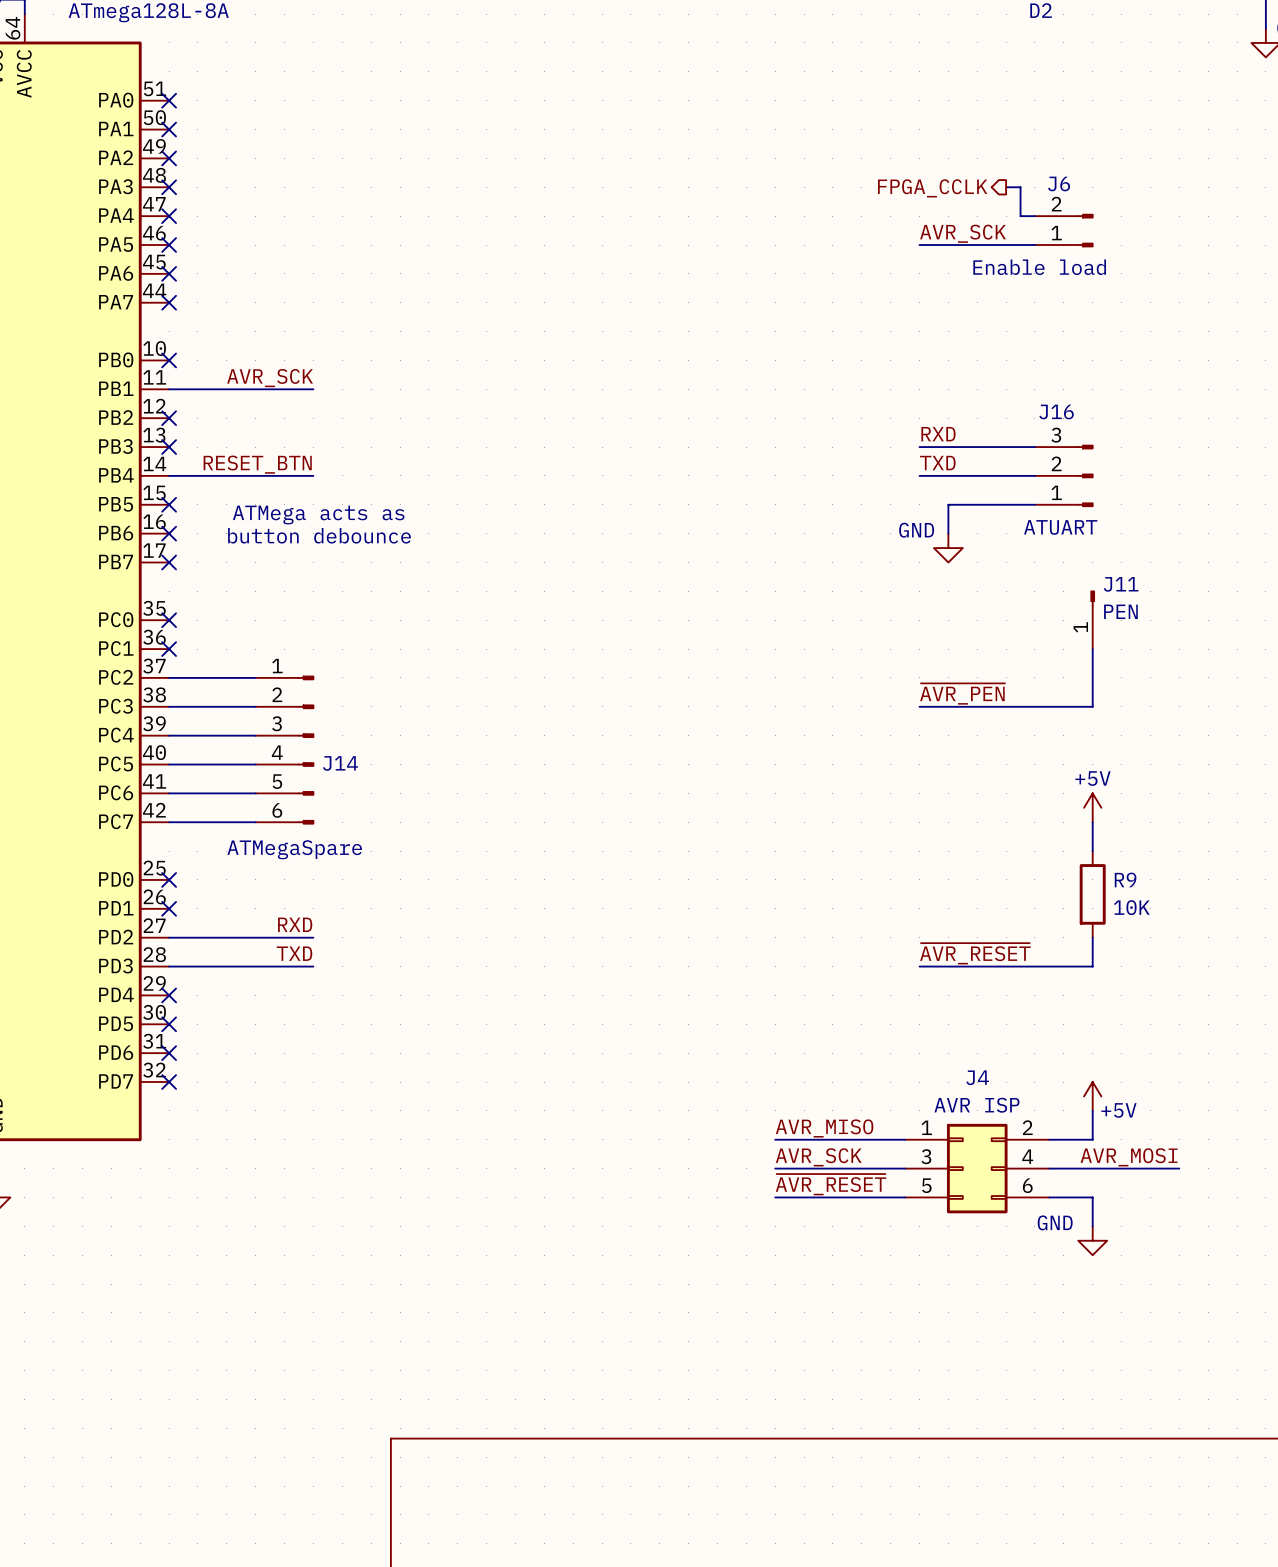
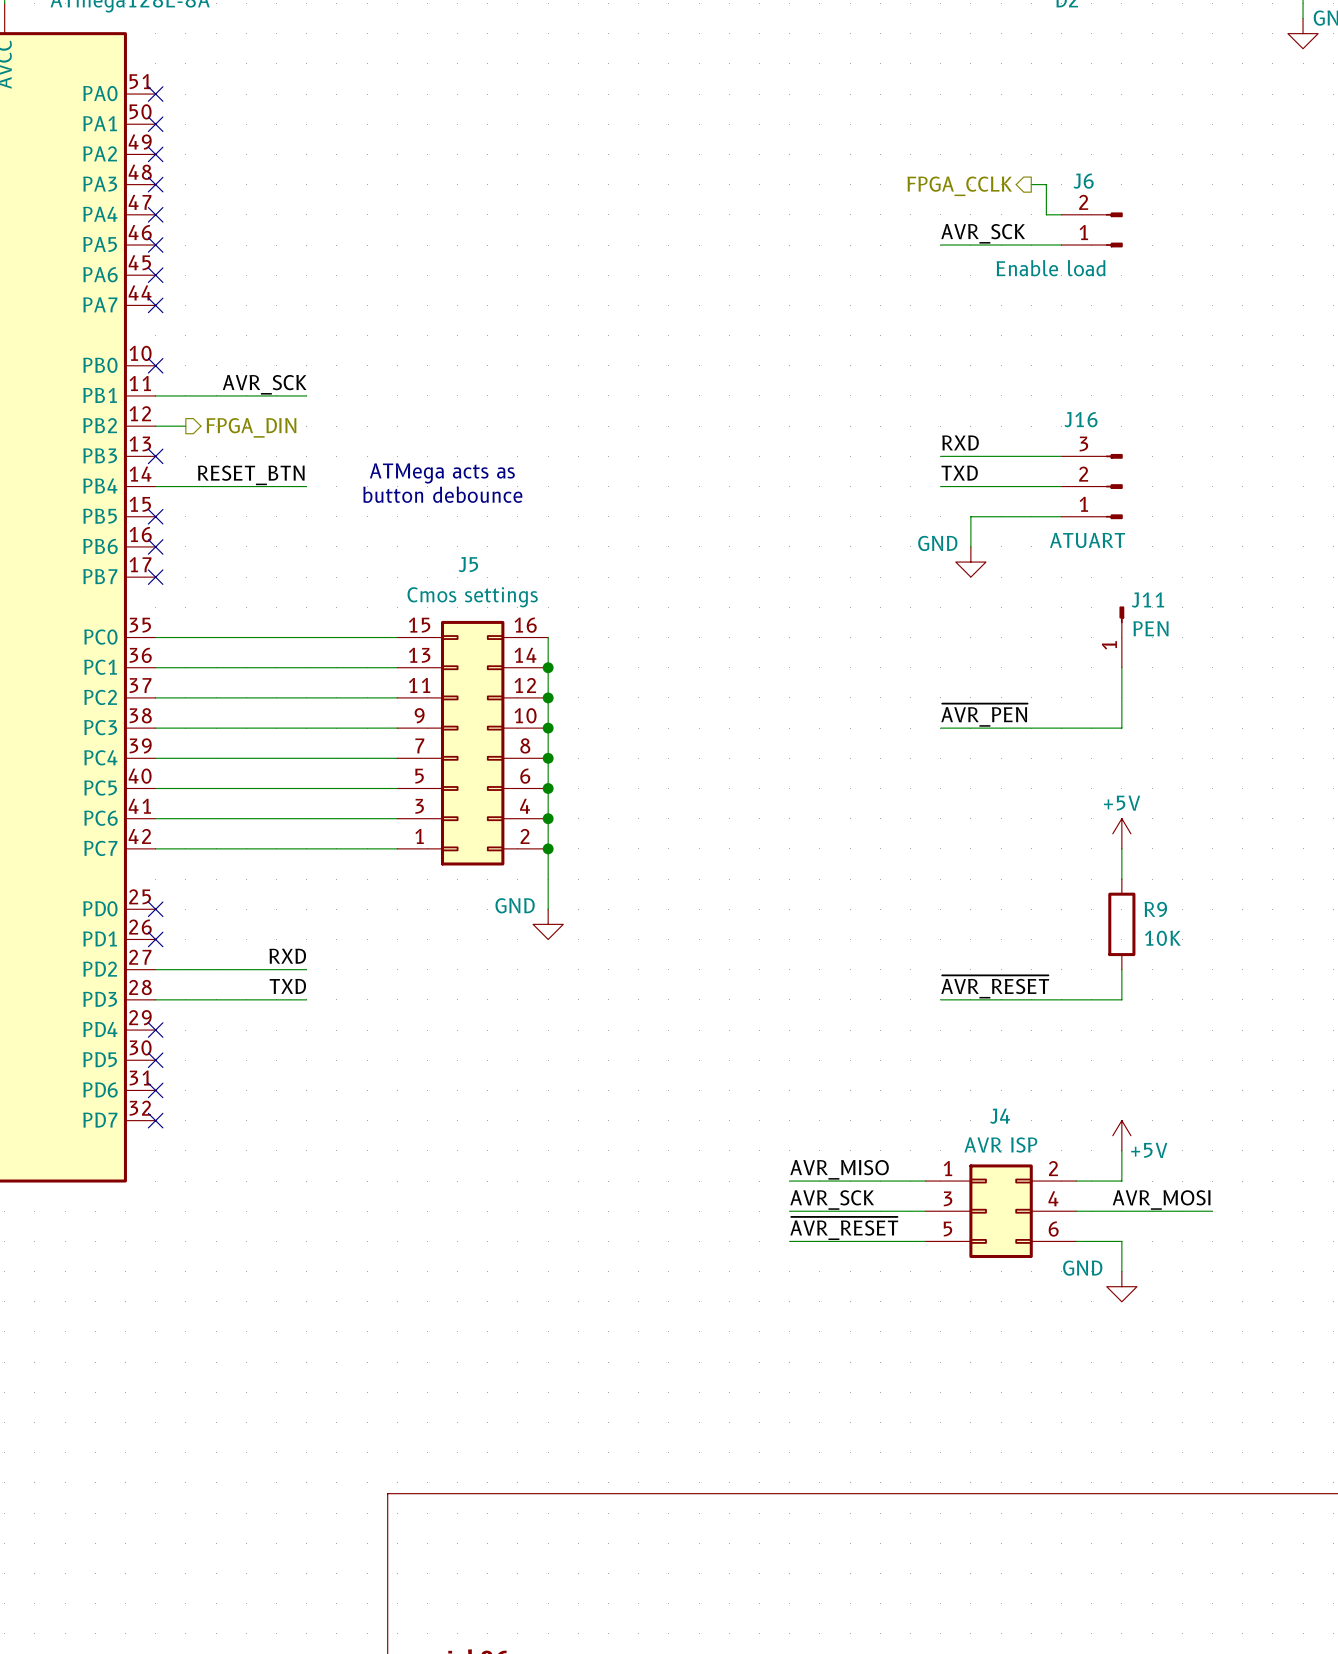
wire: none -> (155, 426) (185, 426)
no-connect mark: (169, 418) -> none
hierarchical label: none -> FPGA_DIN (251, 427)
text position: ATMega acts as (318, 515) -> ATMega acts as (442, 473)
text position: button debounce (319, 535) -> button debounce (442, 494)
wire: none -> (155, 637) (397, 637)
no-connect mark: (169, 620) -> none
wire: none -> (548, 637) (548, 909)
wire: none -> (155, 667) (397, 667)
no-connect mark: (169, 649) -> none
junction: none -> (548, 667)
wire: none -> (246, 697) (397, 697)
junction: none -> (548, 697)
wire: none -> (246, 728) (397, 728)
junction: none -> (548, 728)
J5: none -> Cmos settings (472, 743)
wire: none -> (246, 758) (397, 758)
junction: none -> (548, 758)
J14: ATMegaSpare (284, 750) -> none
wire: none -> (246, 788) (397, 788)
junction: none -> (548, 788)
wire: none -> (246, 818) (397, 818)
junction: none -> (548, 818)
wire: none -> (246, 848) (397, 848)
junction: none -> (548, 848)
power symbol: none -> GND (548, 924)

